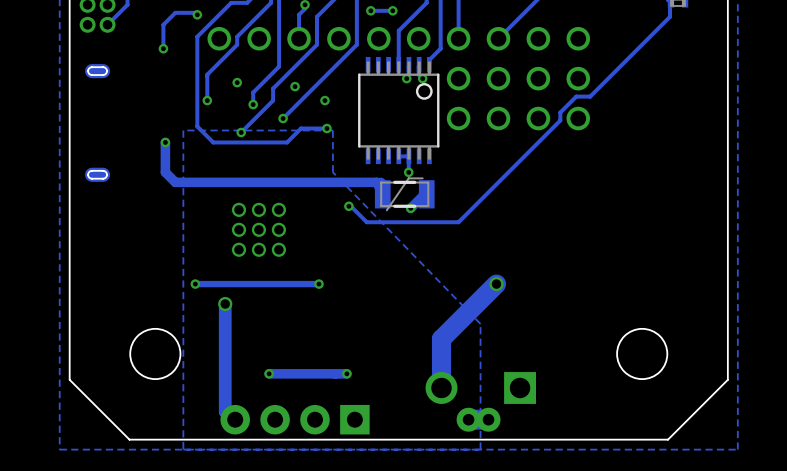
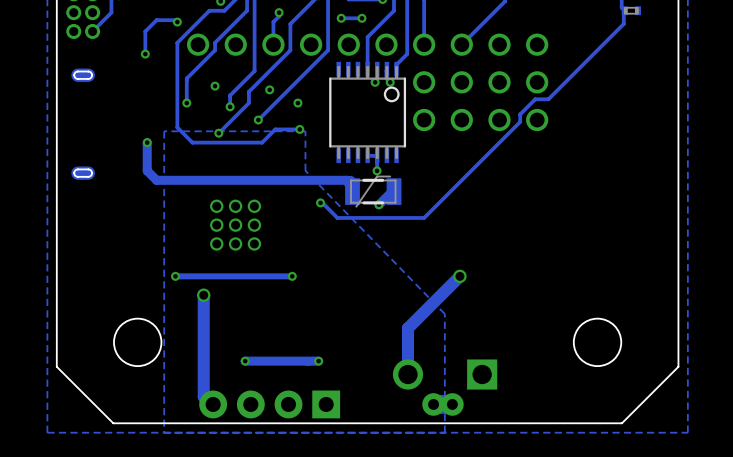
track width: thick (496, 284) (441, 339) (441, 387) -> thin (459, 276) (407, 328) (407, 374)

